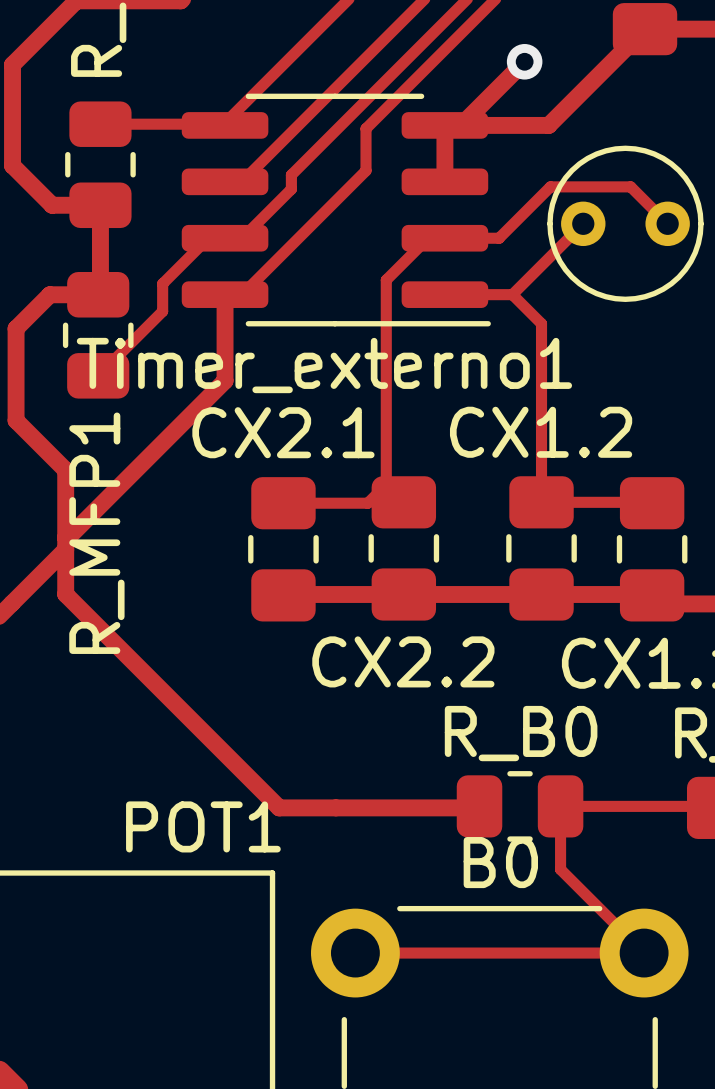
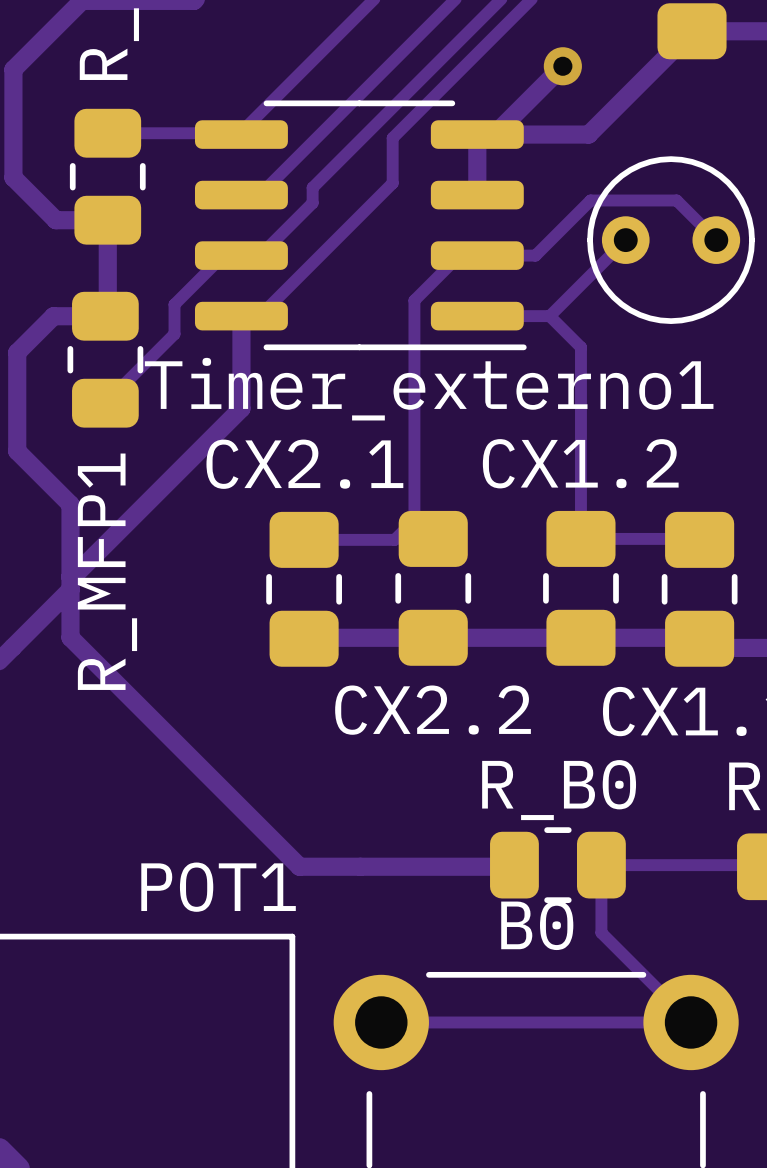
Timer_externo1 name position: Timer_externo1 (324, 365) -> Timer_externo1 (429, 389)

